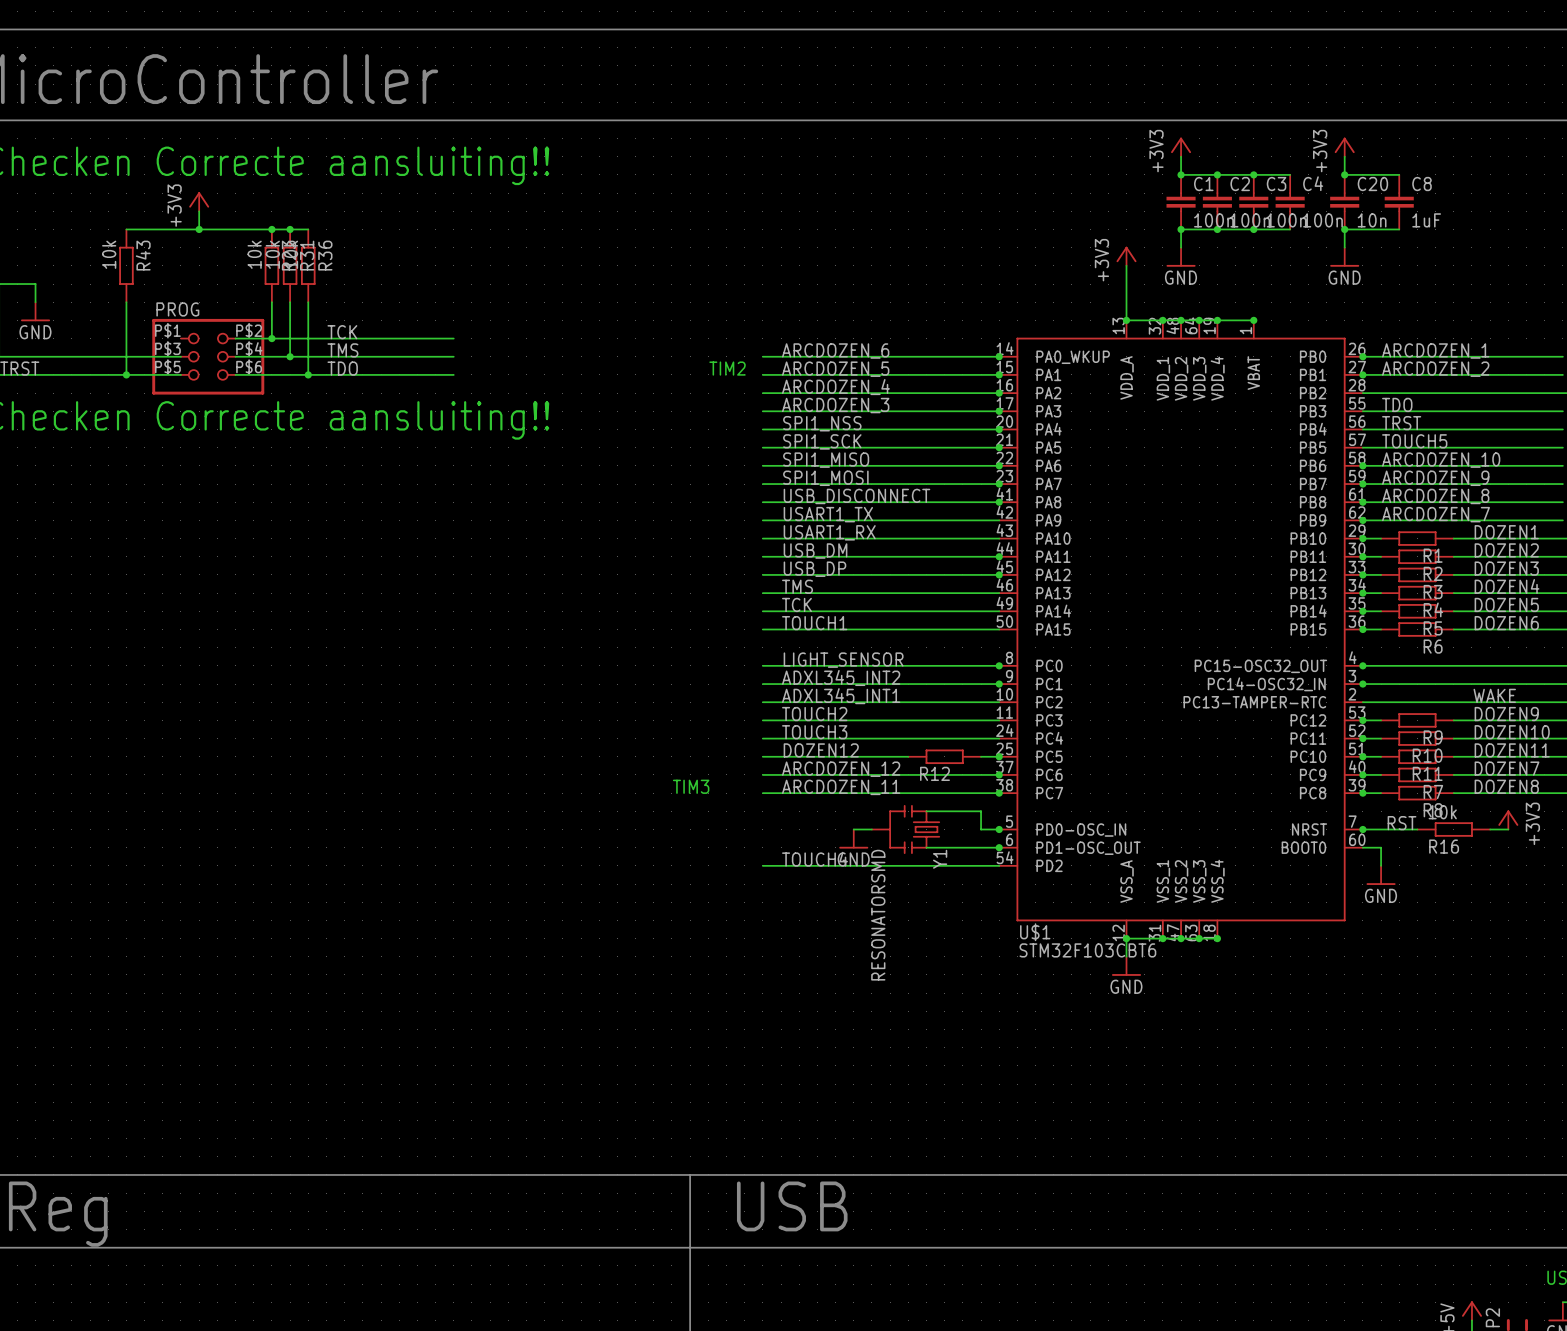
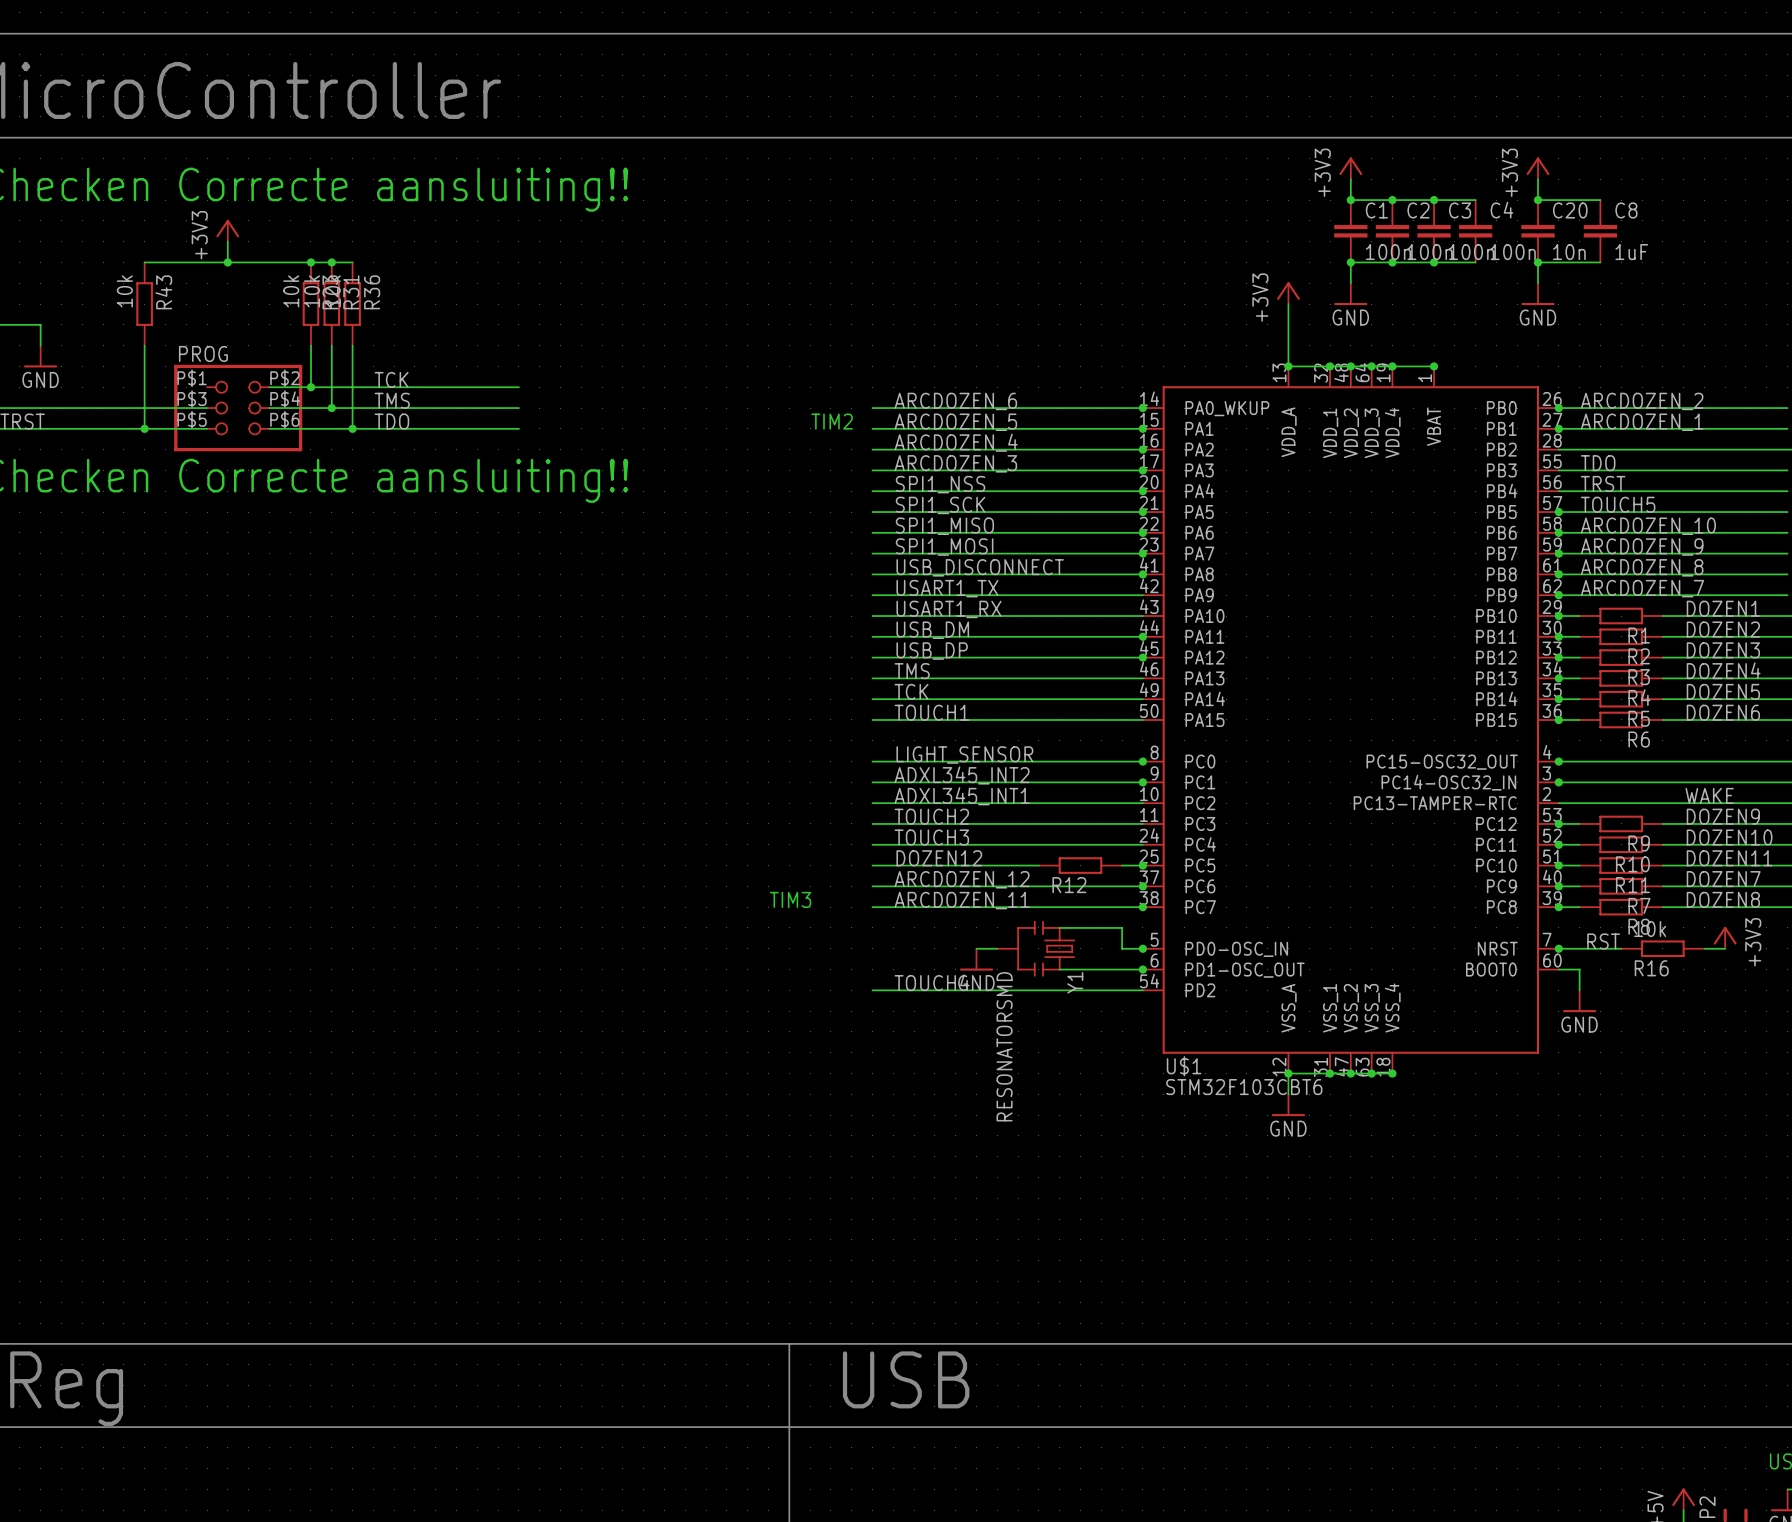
label: ARCDOZEN_1 (1435, 350) -> ARCDOZEN_2 (1642, 401)
label: ARCDOZEN_2 (1435, 369) -> ARCDOZEN_1 (1642, 422)
junction: none -> (1558, 512)

